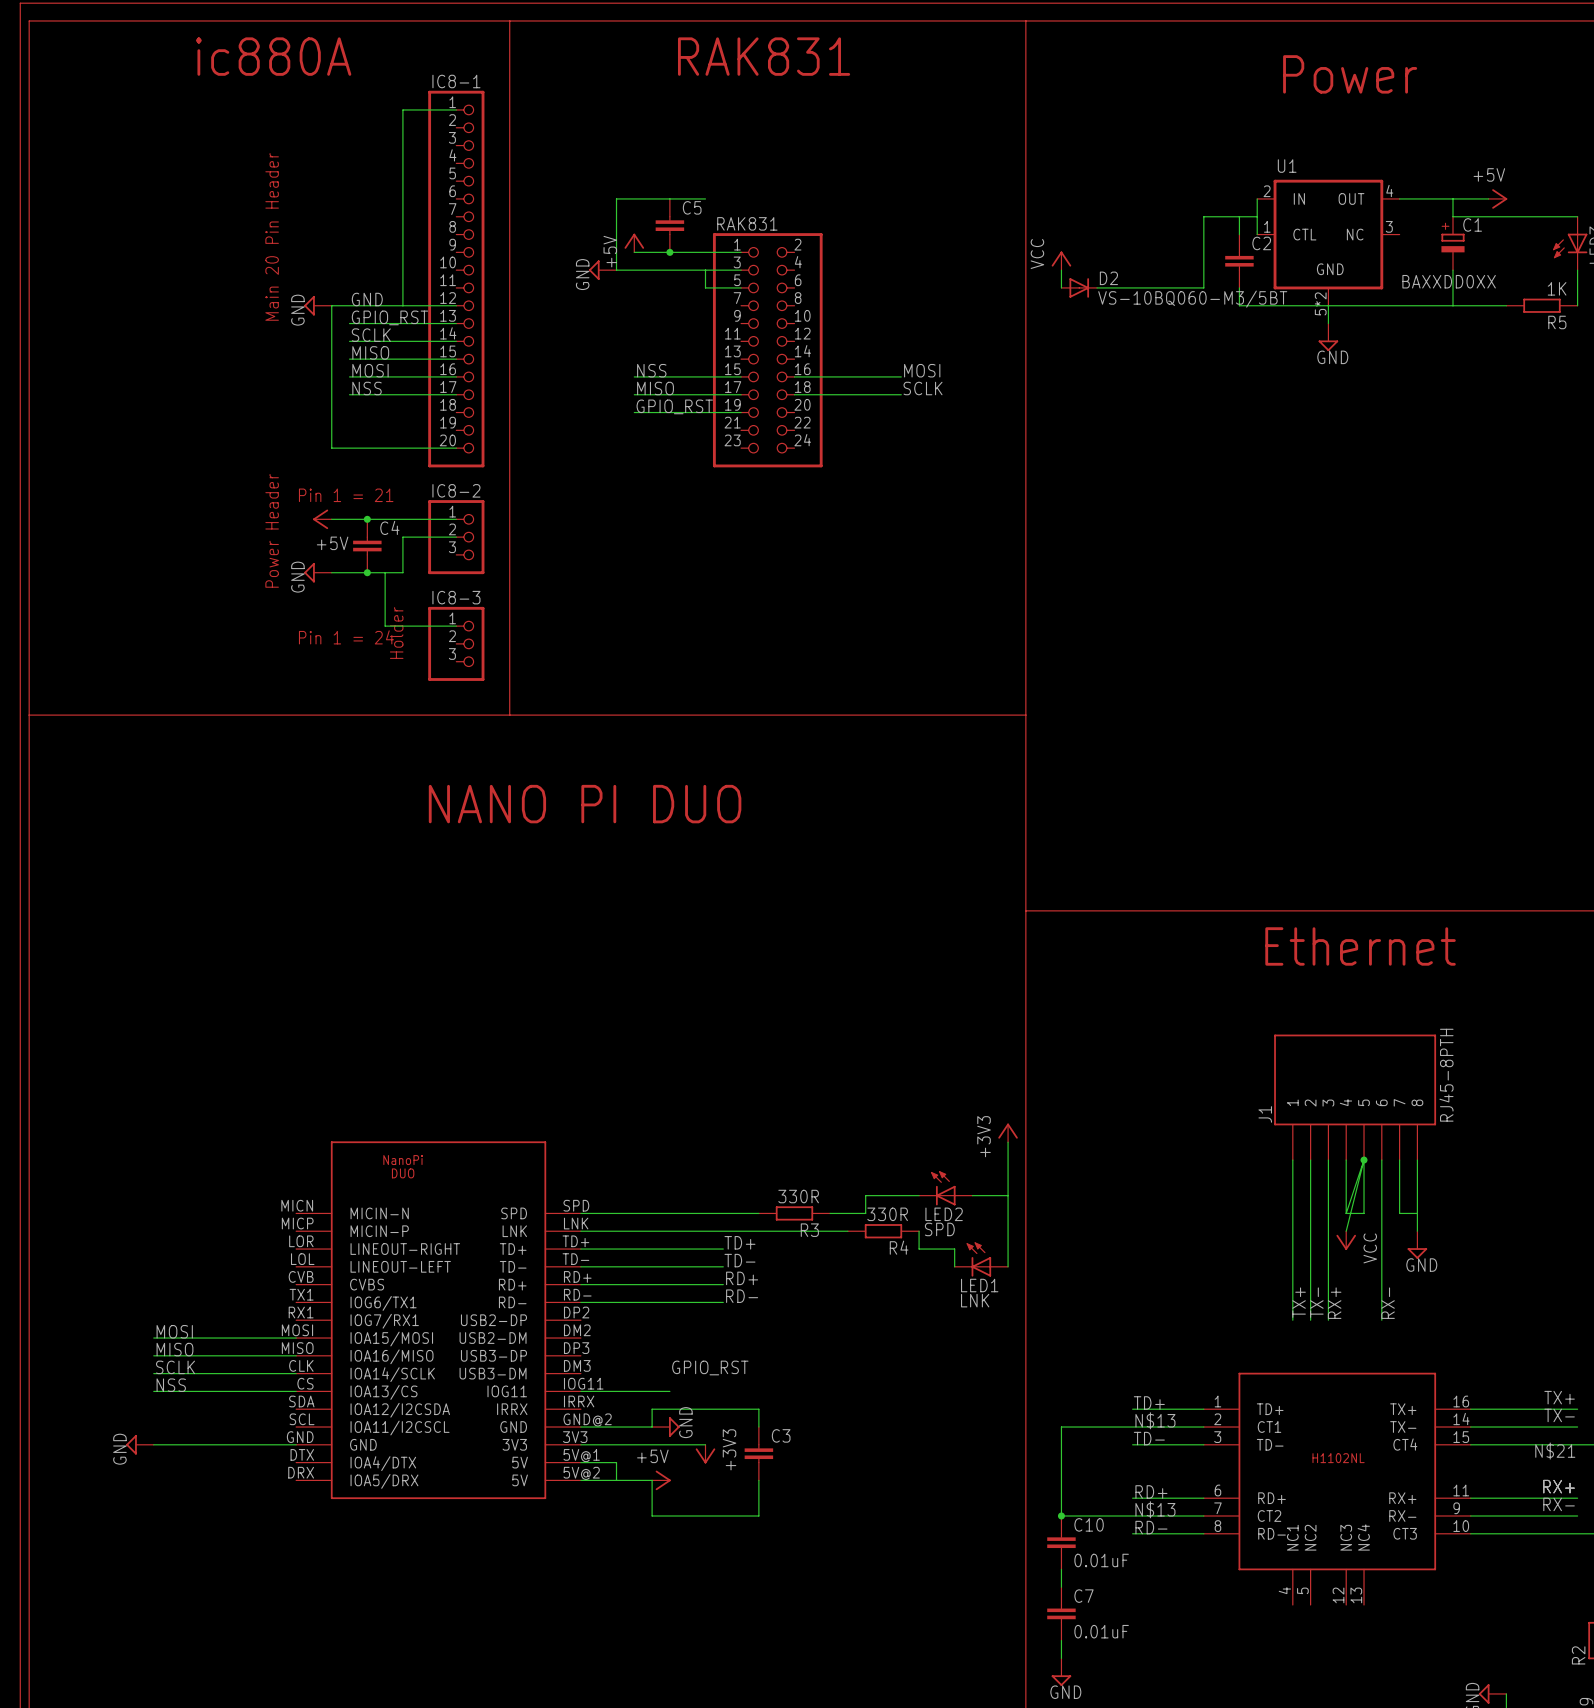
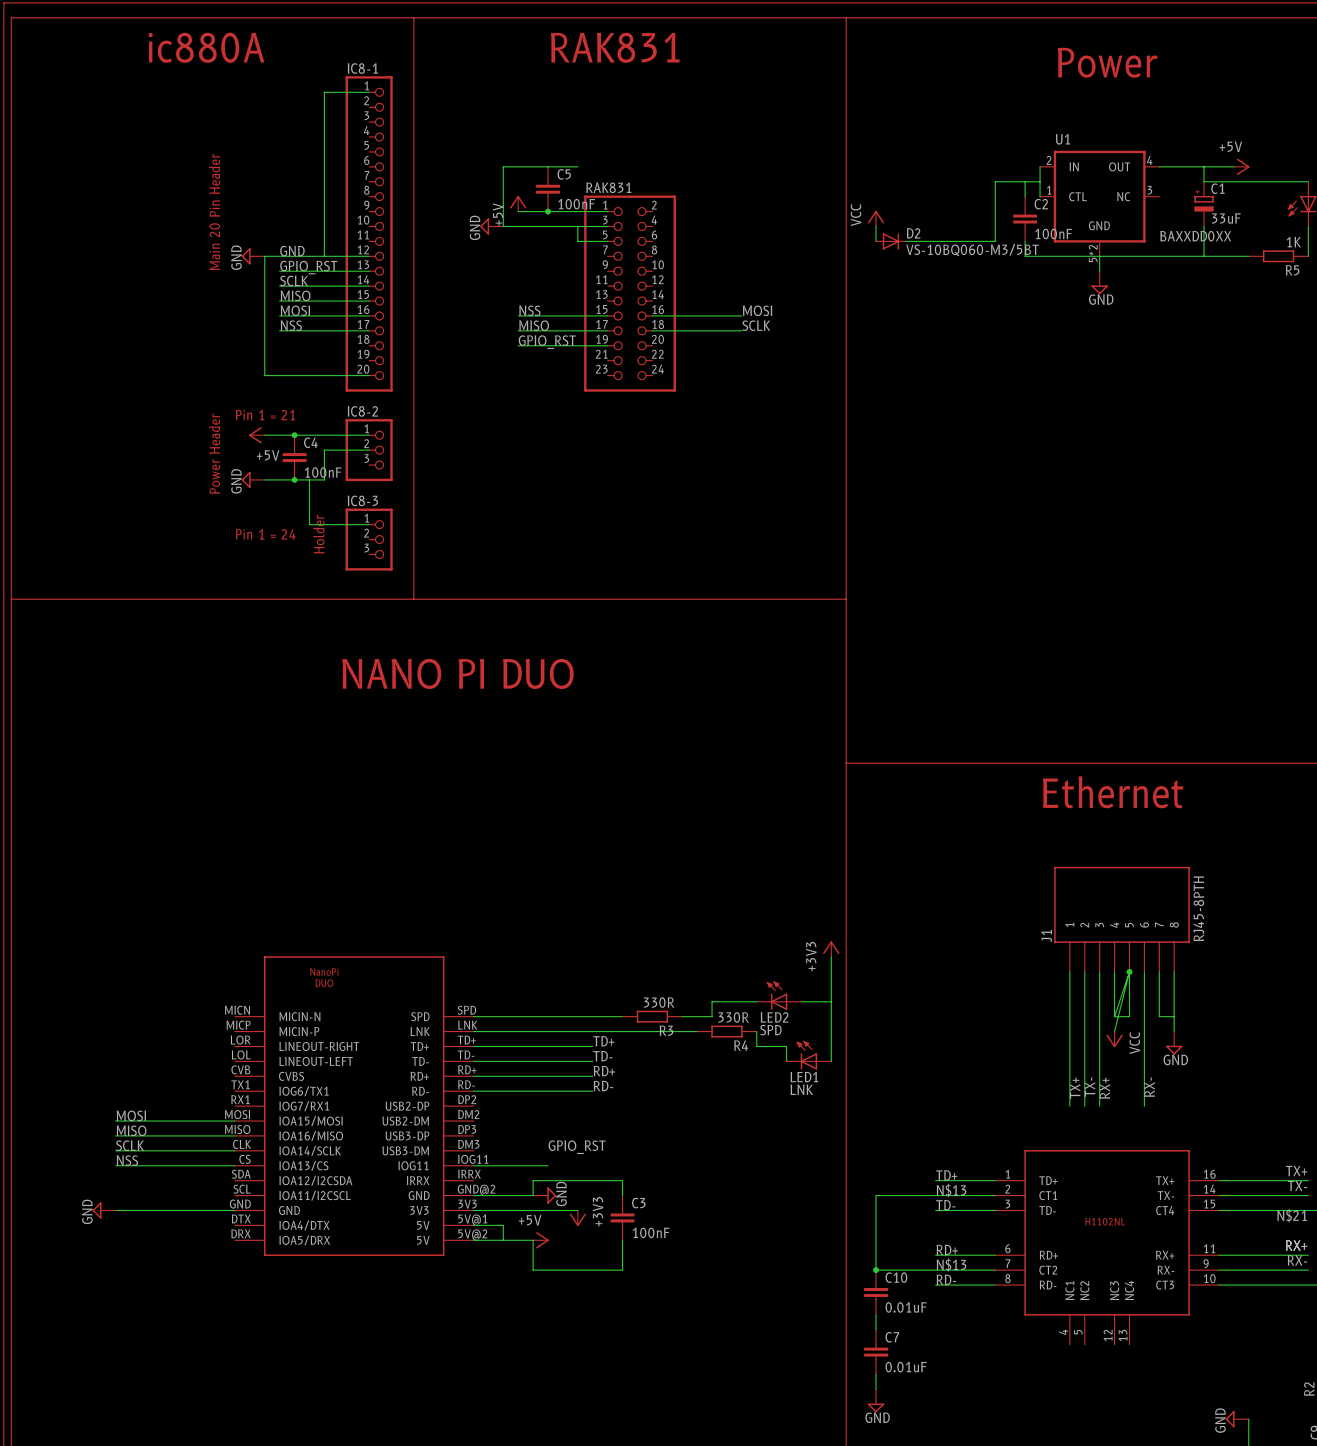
C5 value: none -> 100nF (576, 204)
C1 value: none -> 33uF (1226, 218)
C2 value: none -> 100nF (1053, 234)
C4 value: none -> 100nF (323, 472)
C3 value: none -> 100nF (651, 1232)

